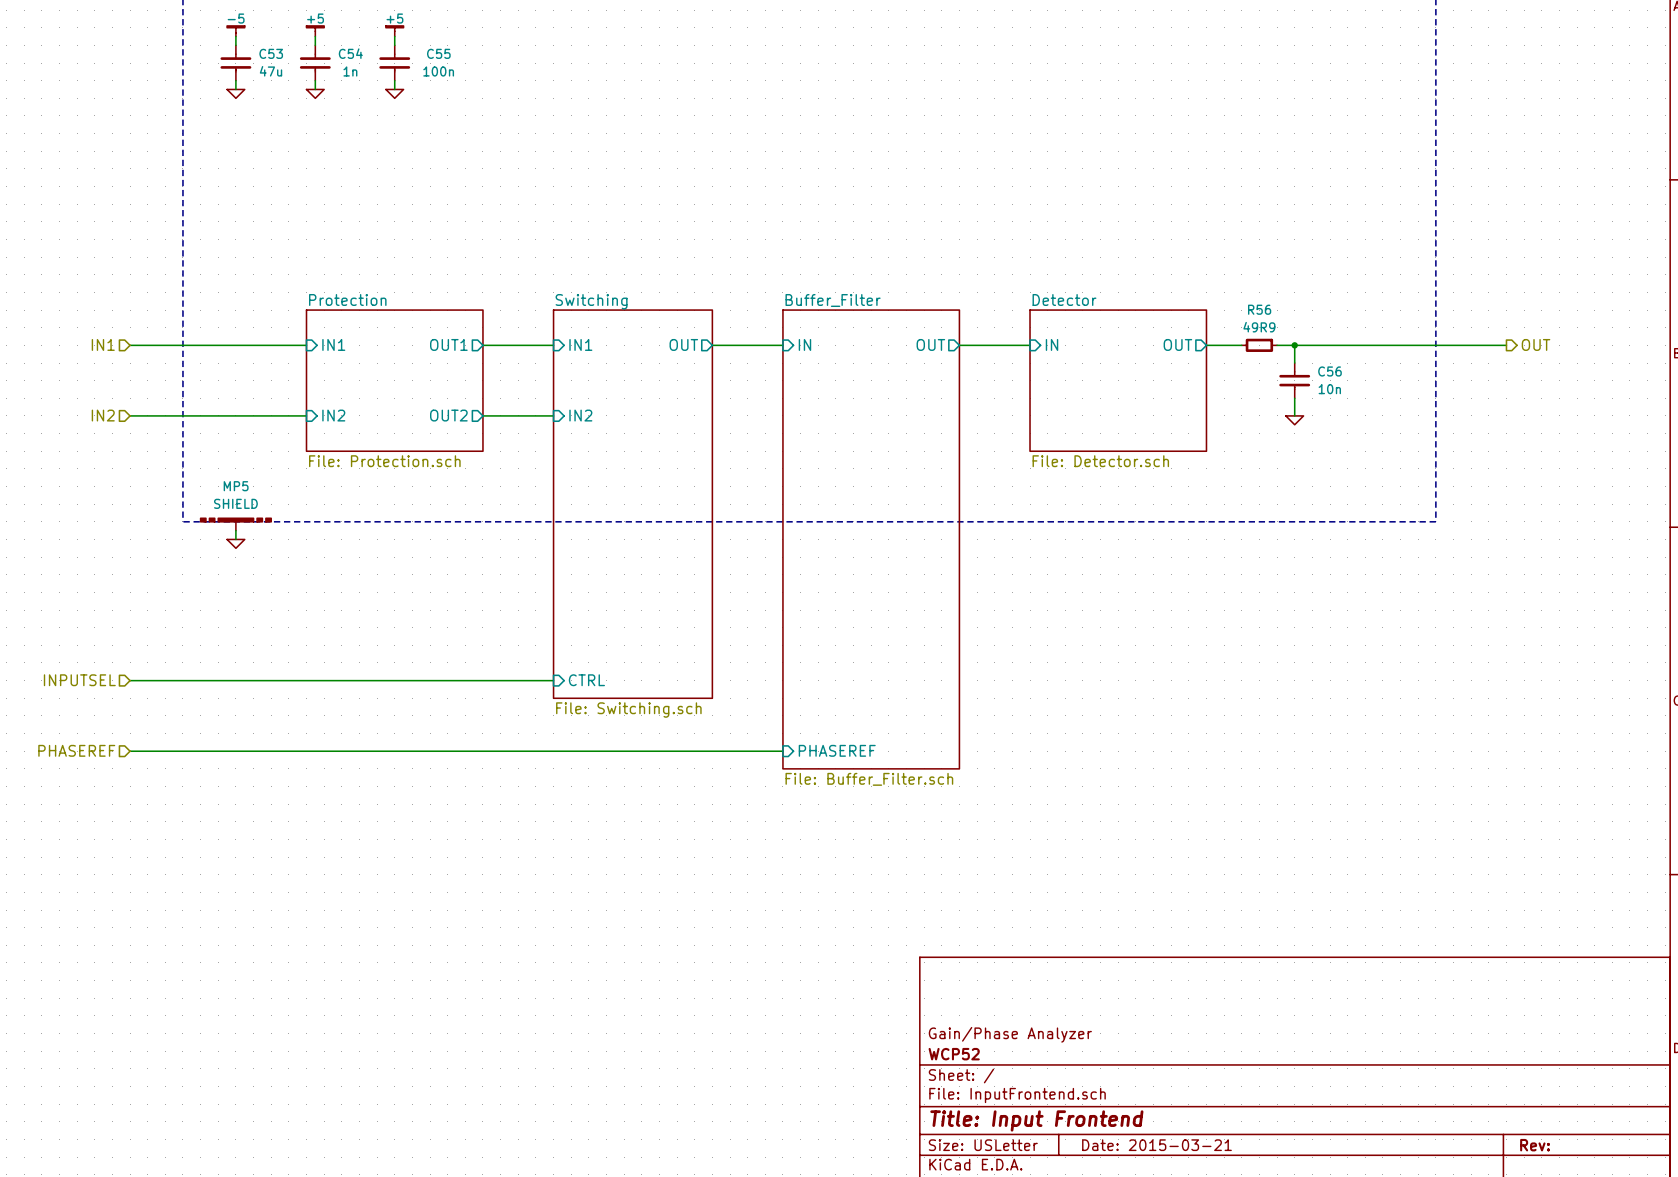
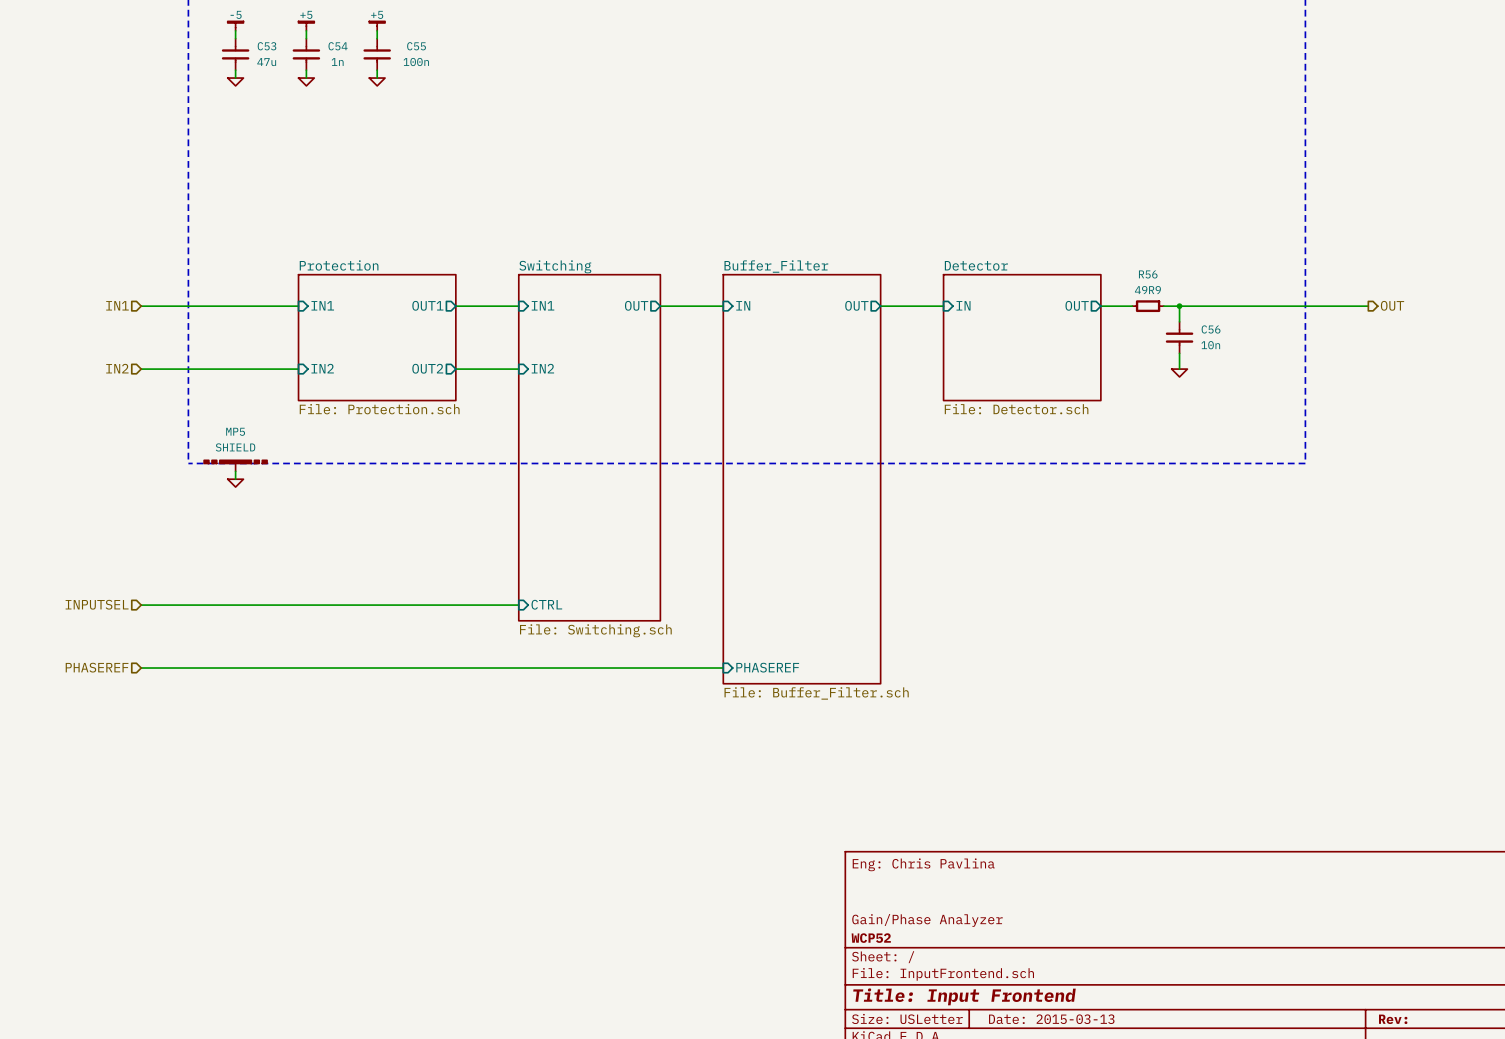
title block: none -> Eng: Chris Pavlina (923, 864)
title block: Date: 2015-03-21 (1156, 1145) -> Date: 2015-03-13 (1051, 1019)

